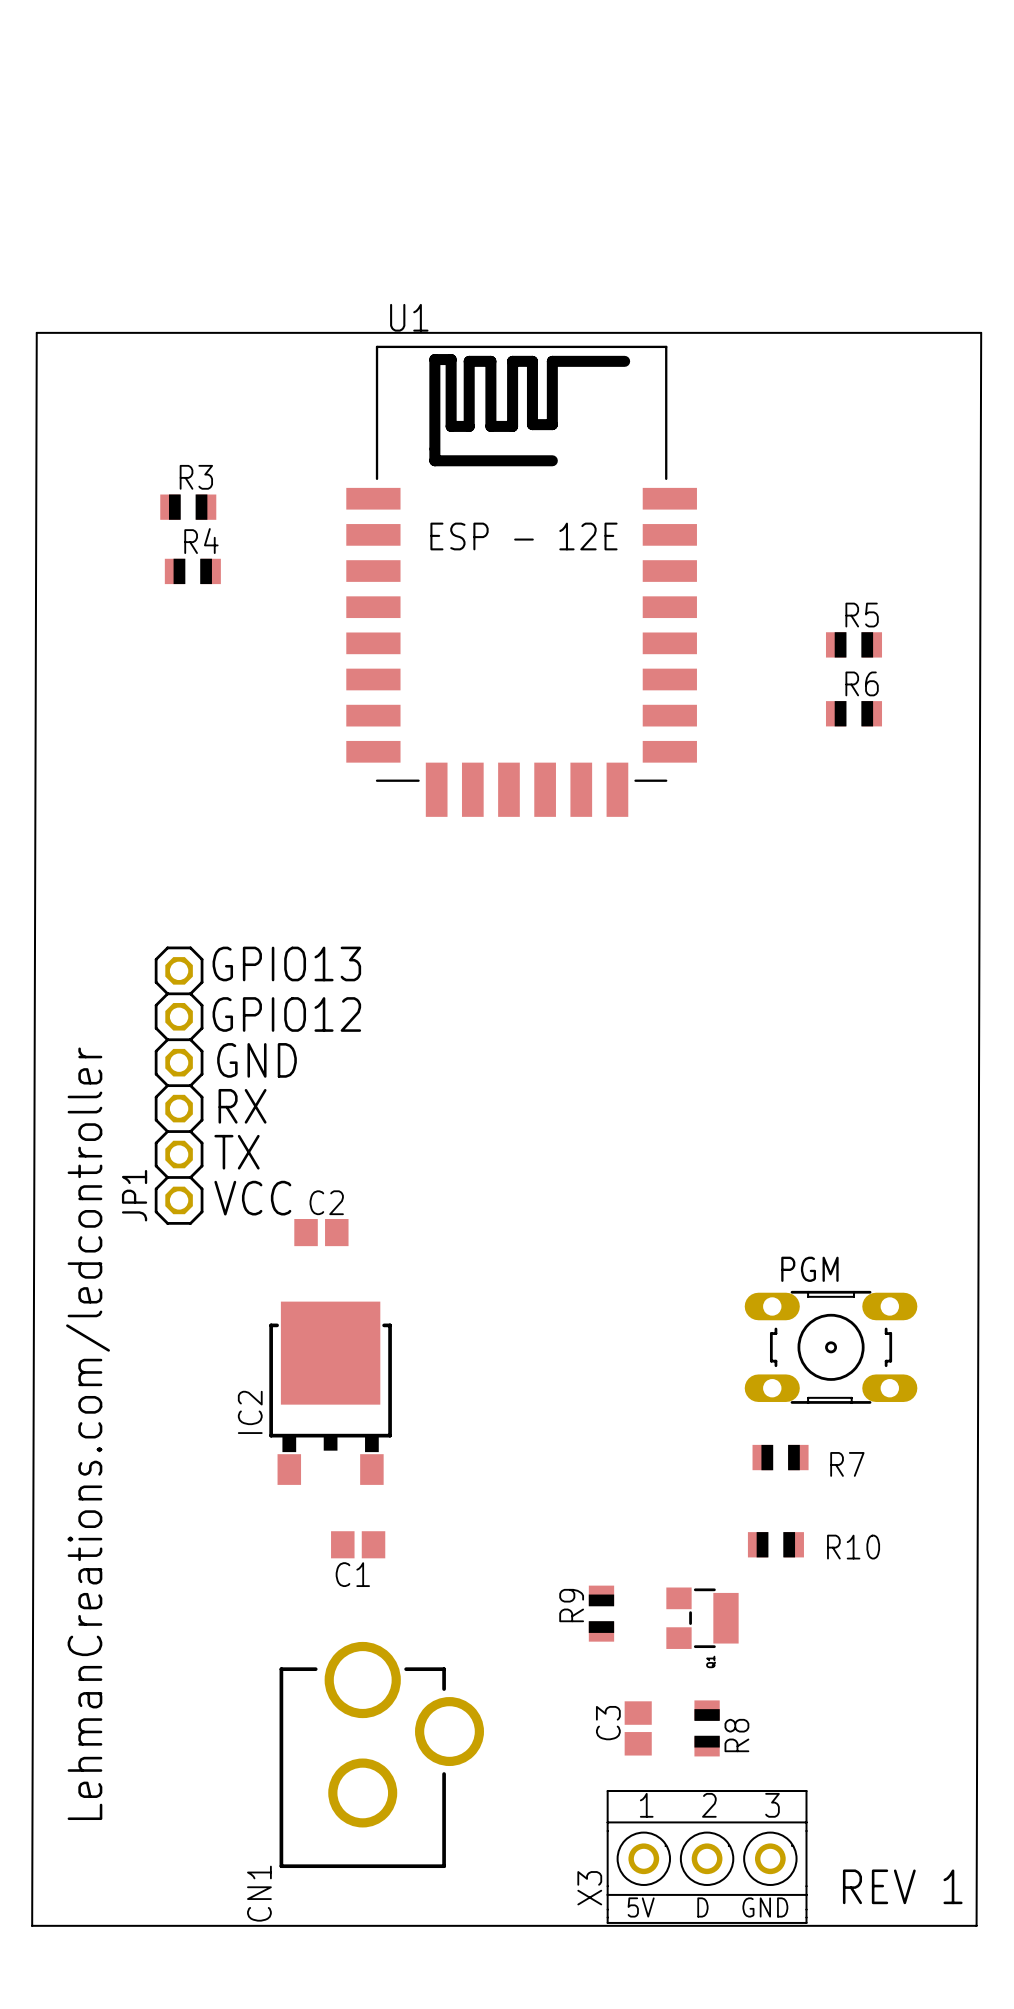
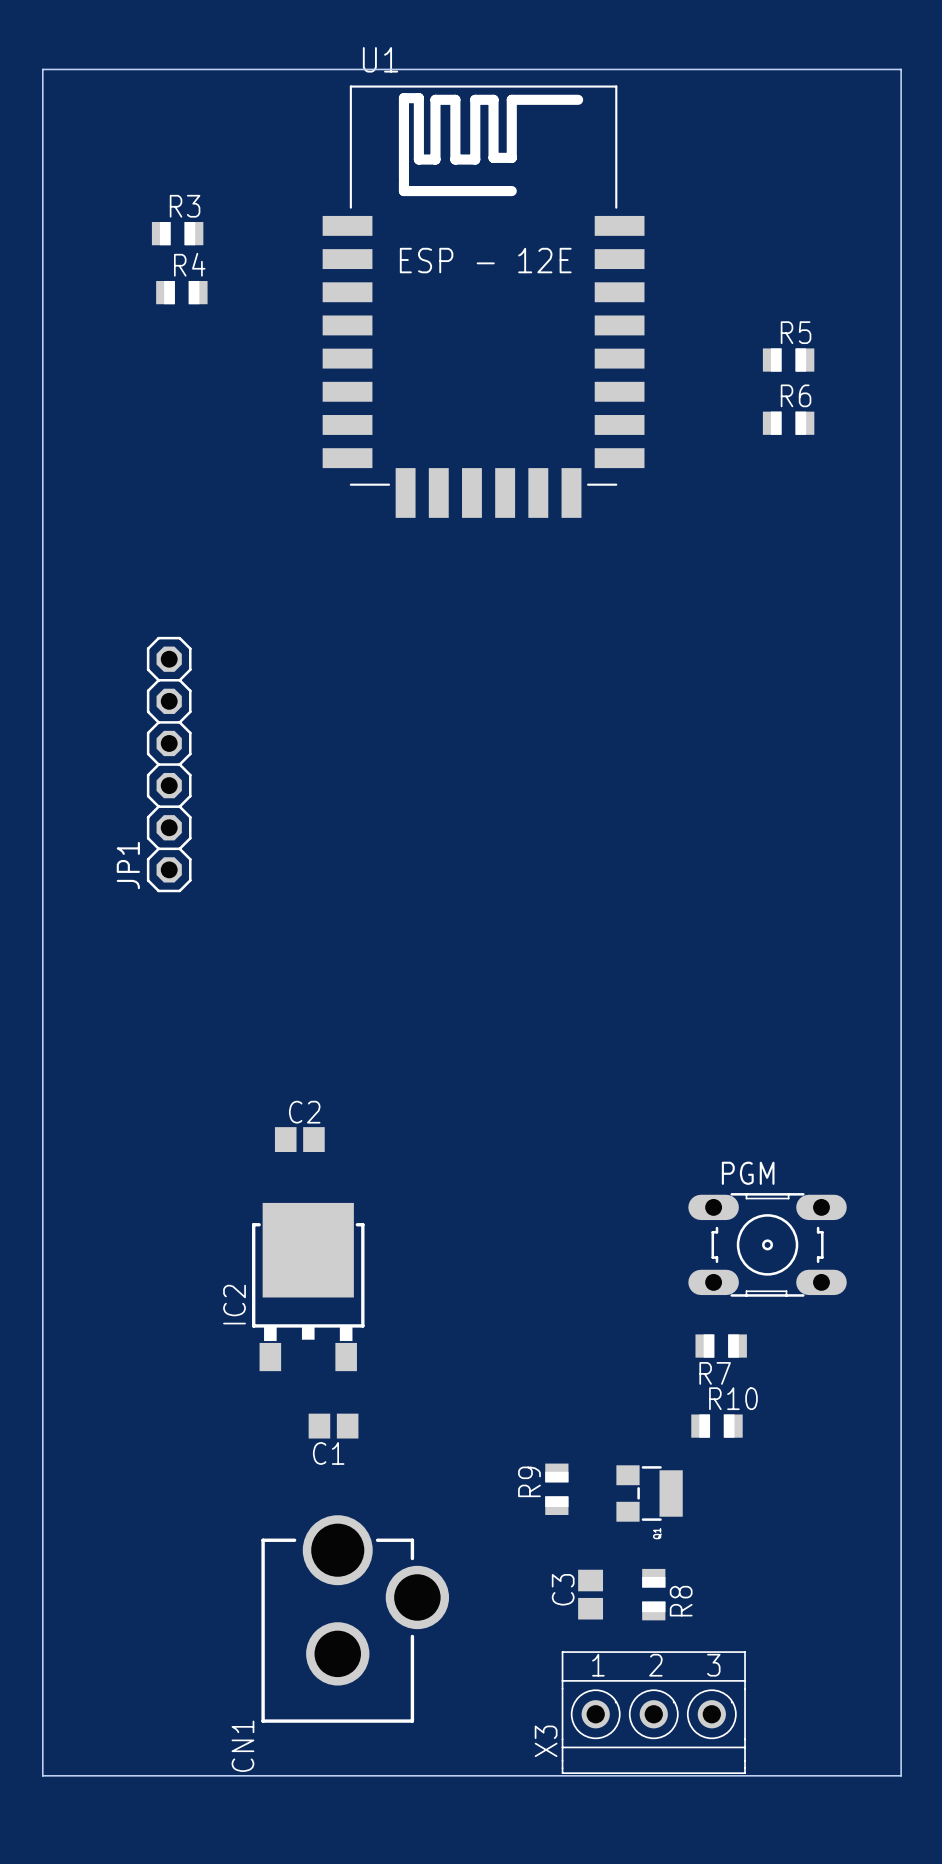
R3 position: (188, 507) -> (177, 233)
R4 position: (192, 571) -> (181, 292)
U1 position: (521, 581) -> (483, 301)
R5 position: (854, 644) -> (788, 360)
R6 position: (854, 713) -> (788, 423)
text: GPIO13 (286, 963) -> none
text: GPIO12 (286, 1014) -> none
text: GND (256, 1060) -> none
JP1 position: (179, 1085) -> (169, 764)
text: RX (242, 1106) -> none
text: TX (237, 1152) -> none
text: VCC (252, 1198) -> none
text: LehmanCreations.com/ledcontroller (88, 1433) -> none
R7 name position: R7 (847, 1464) -> R7 (715, 1373)
R10 name position: R10 (853, 1547) -> R10 (733, 1398)
text: REV 1 (902, 1886) -> none
text: 5V (641, 1907) -> none
text: D (702, 1907) -> none
text: GND (765, 1907) -> none
board edge: (41, 1925) (32, 1925) (36, 332) (981, 332) (976, 1925) -> (42, 1775) (42, 69) (901, 69) (901, 1775)

